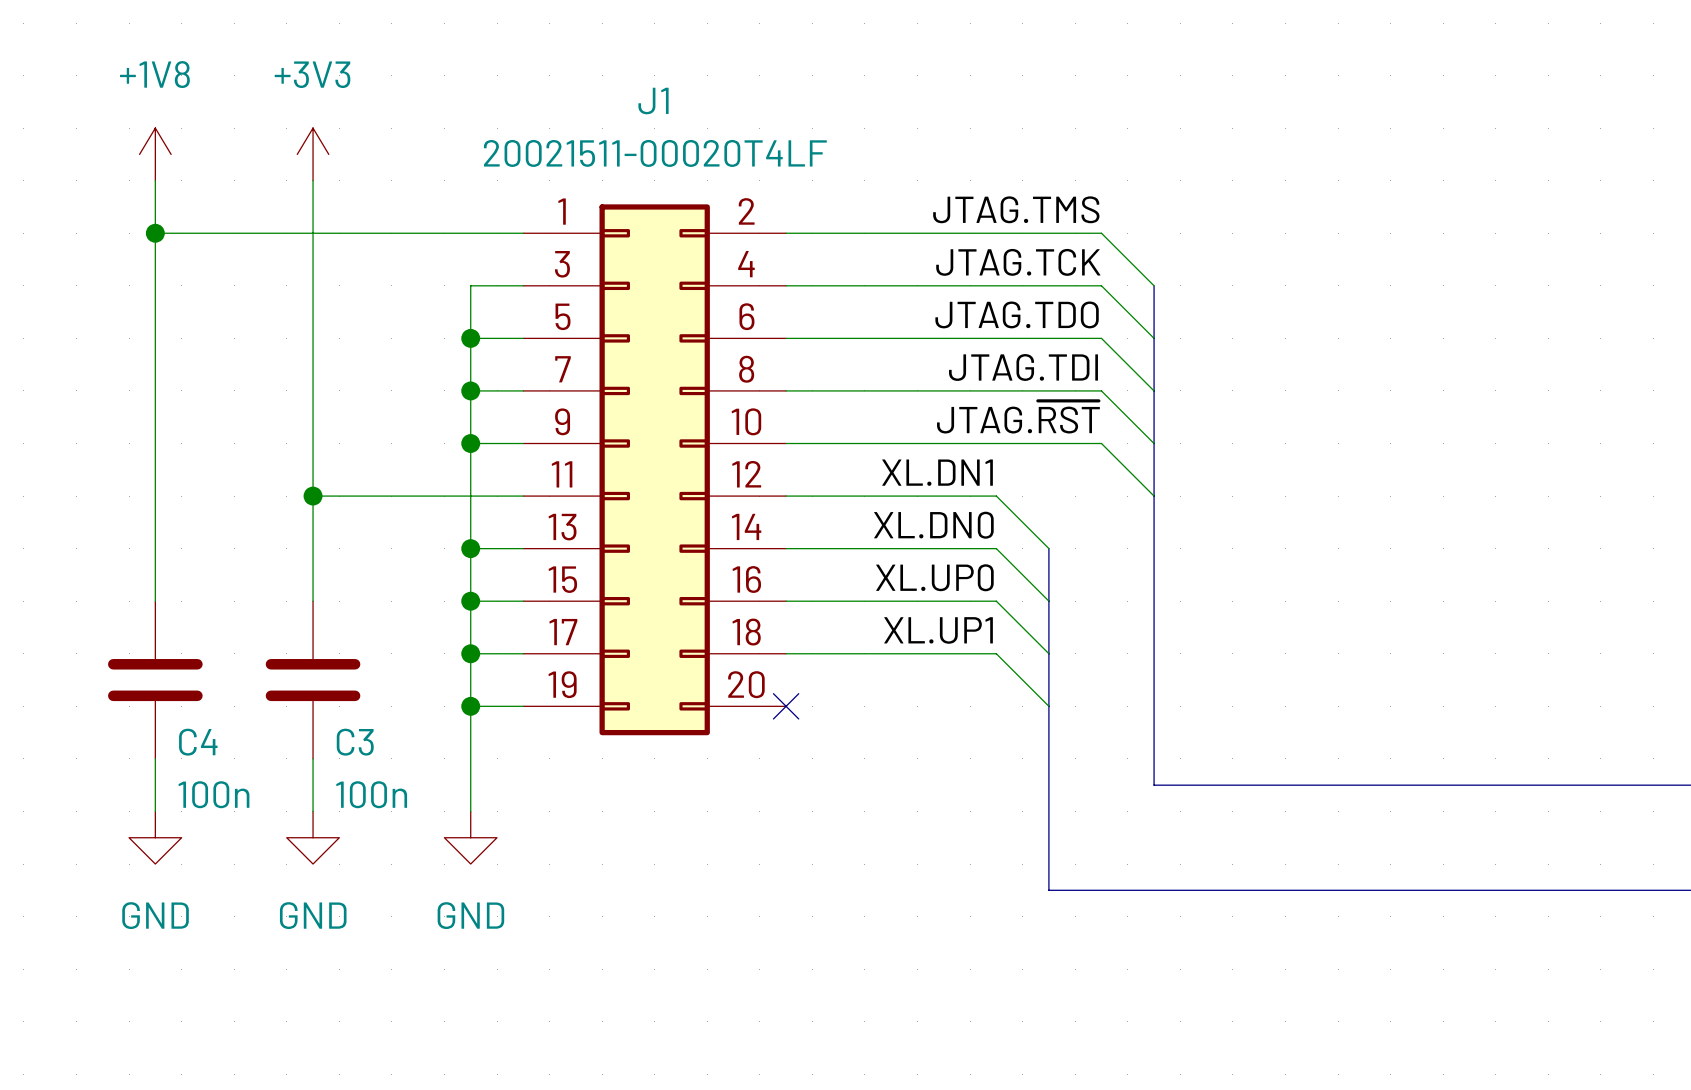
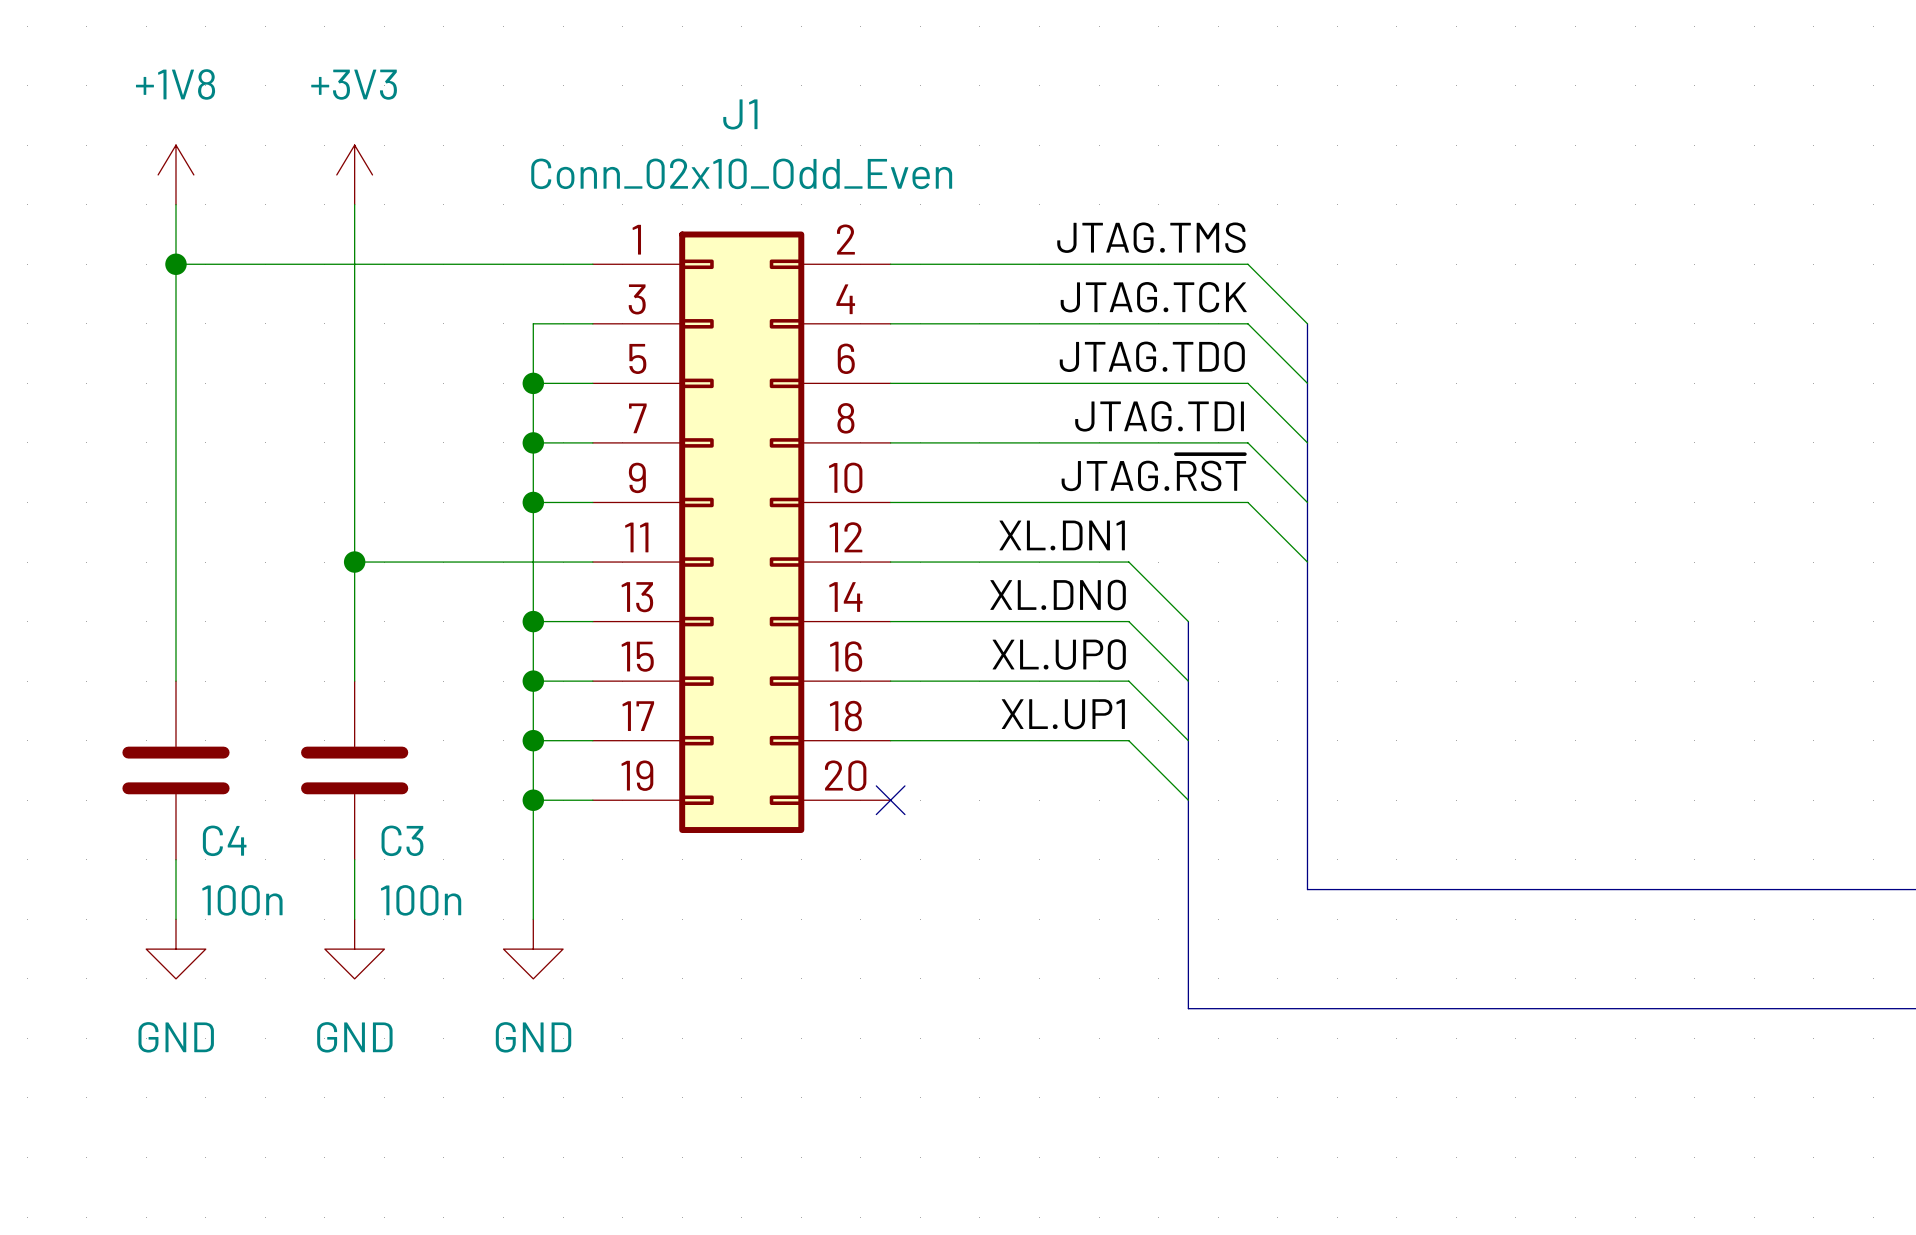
J1 value: 20021511-00020T4LF (655, 153) -> Conn_02x10_Odd_Even (741, 173)

